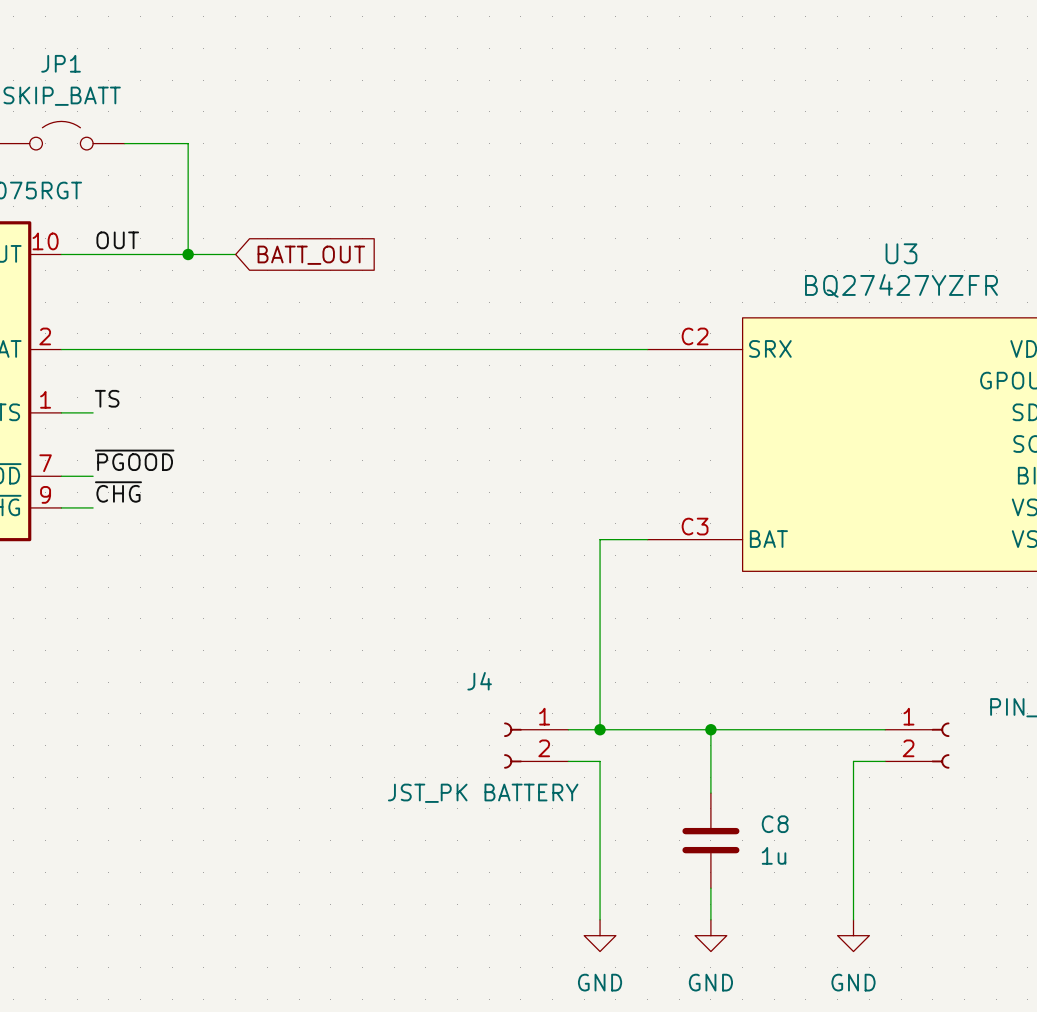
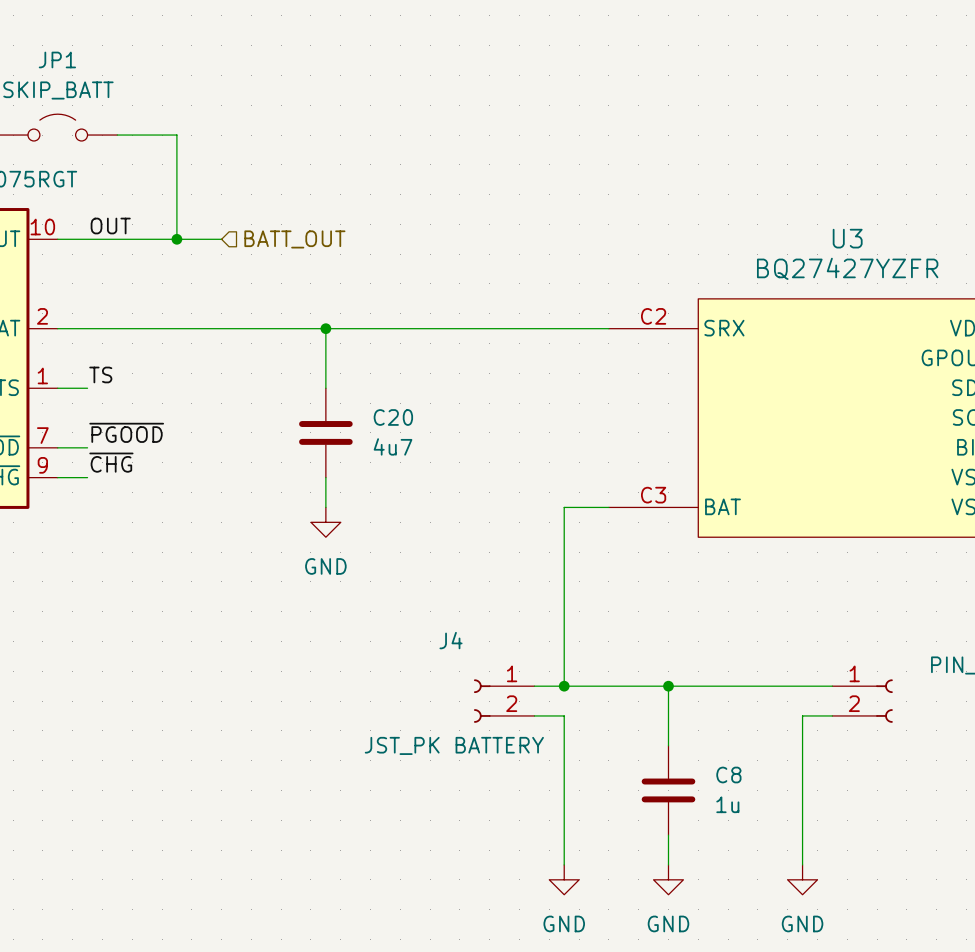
hierarchical label: none -> BATT_OUT (294, 239)
global label: BATT_OUT (311, 255) -> none
wire: none -> (325, 328) (325, 388)
junction: none -> (325, 328)
C20: none -> 4u7 (325, 432)
wire: none -> (325, 477) (325, 507)
power symbol: none -> GND (325, 522)

